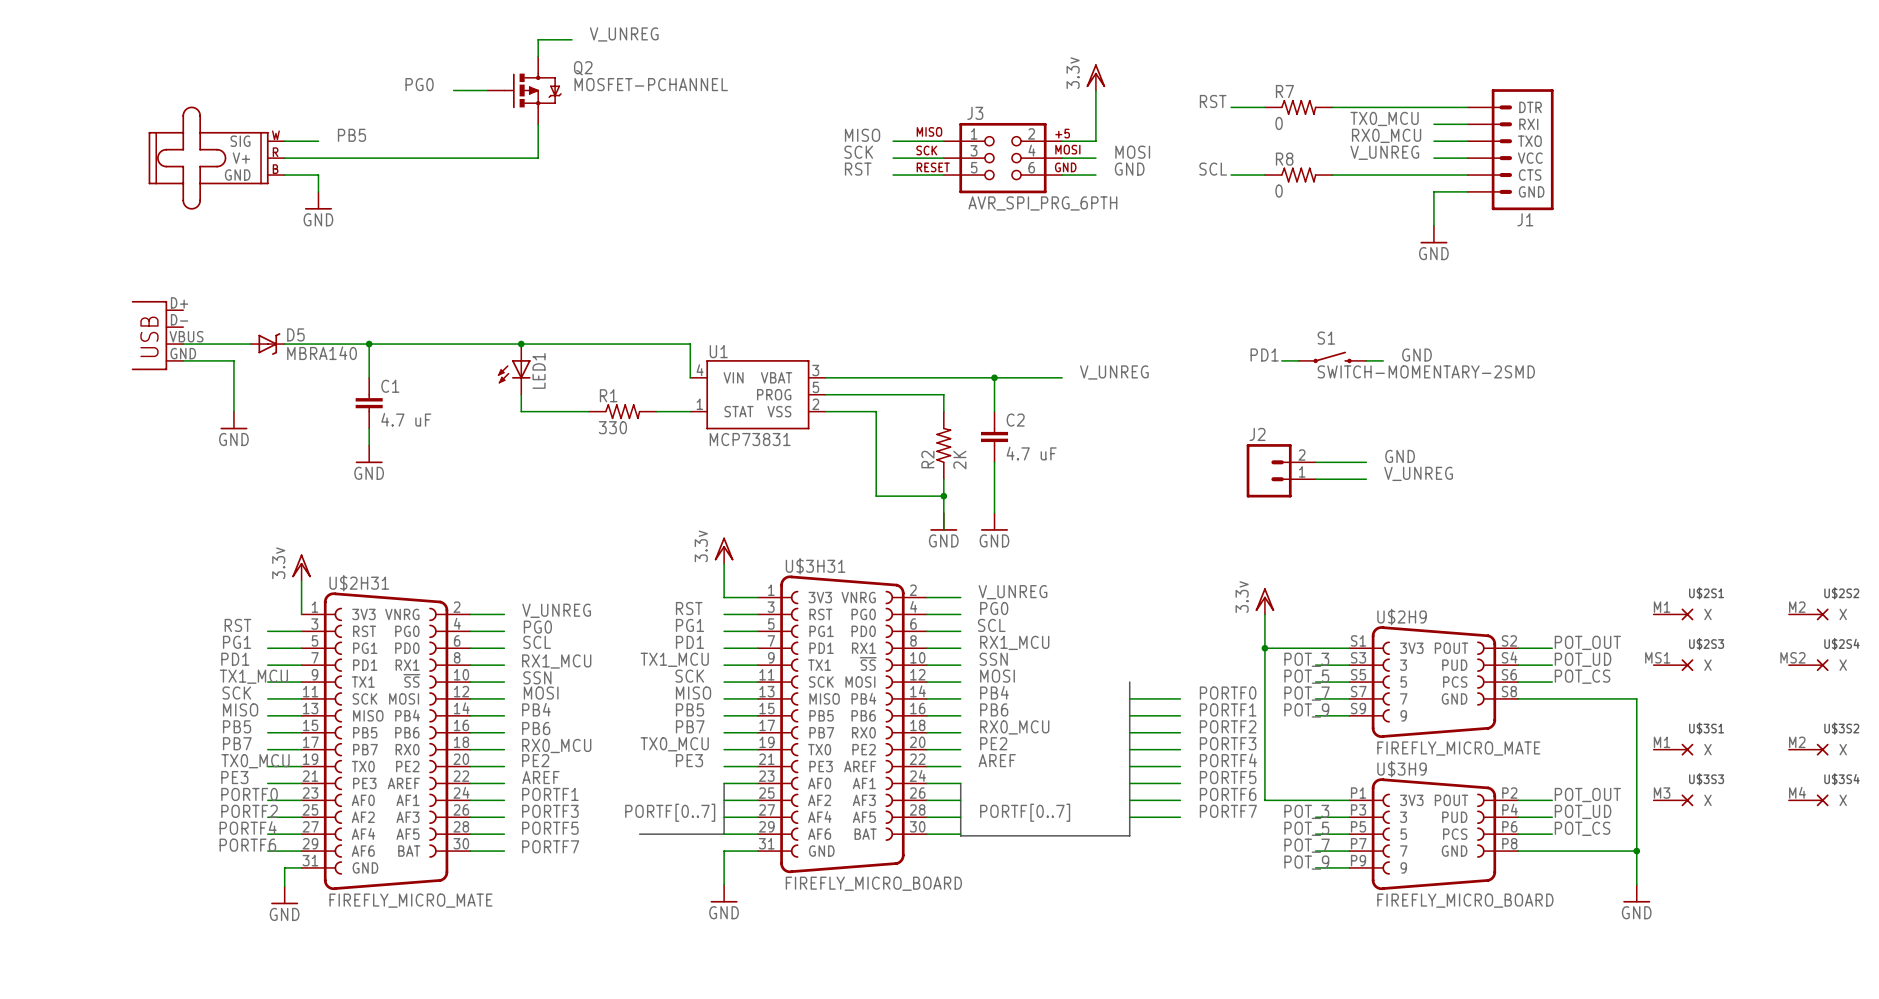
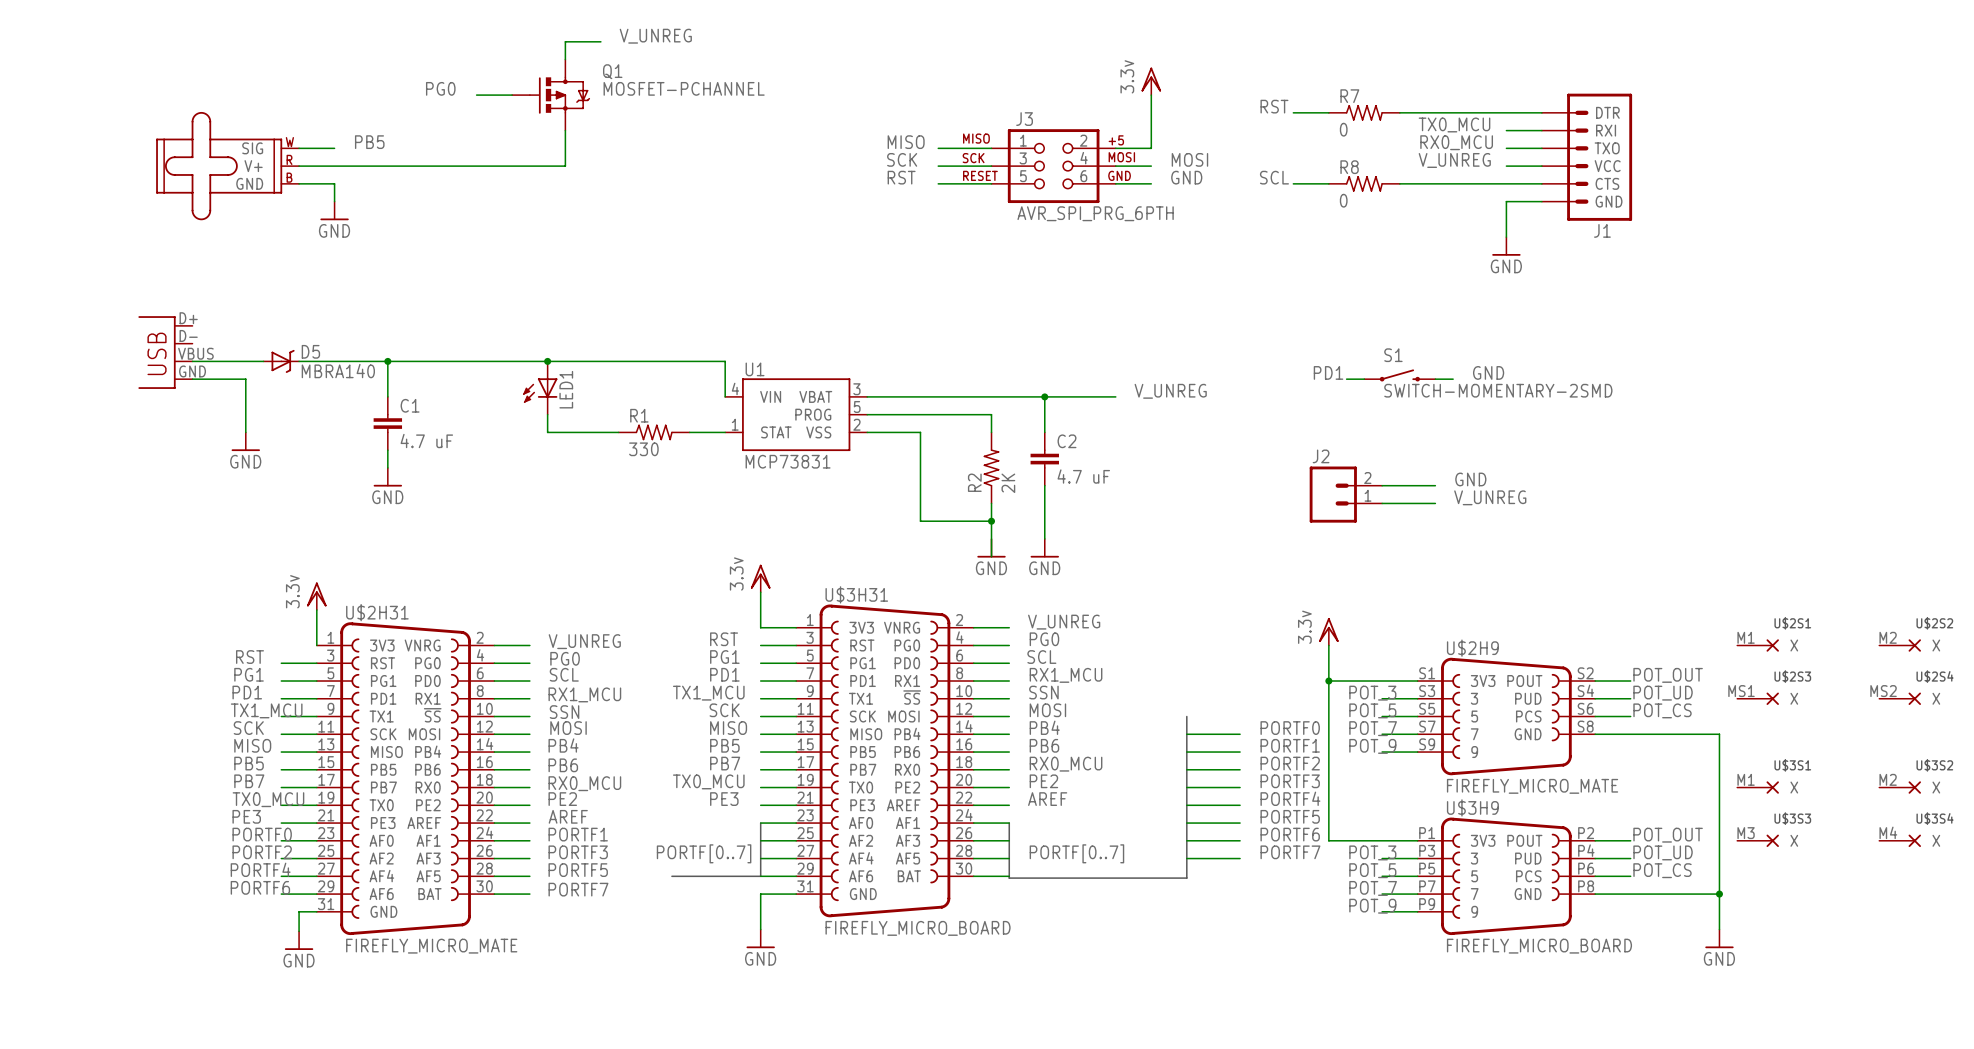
Q2 name: Q2 (583, 68) -> Q1 (612, 71)

